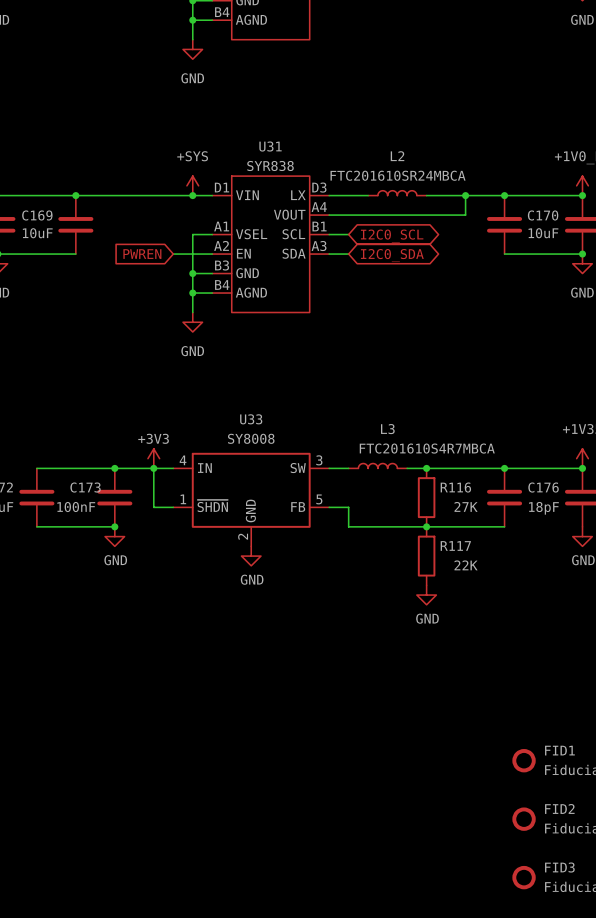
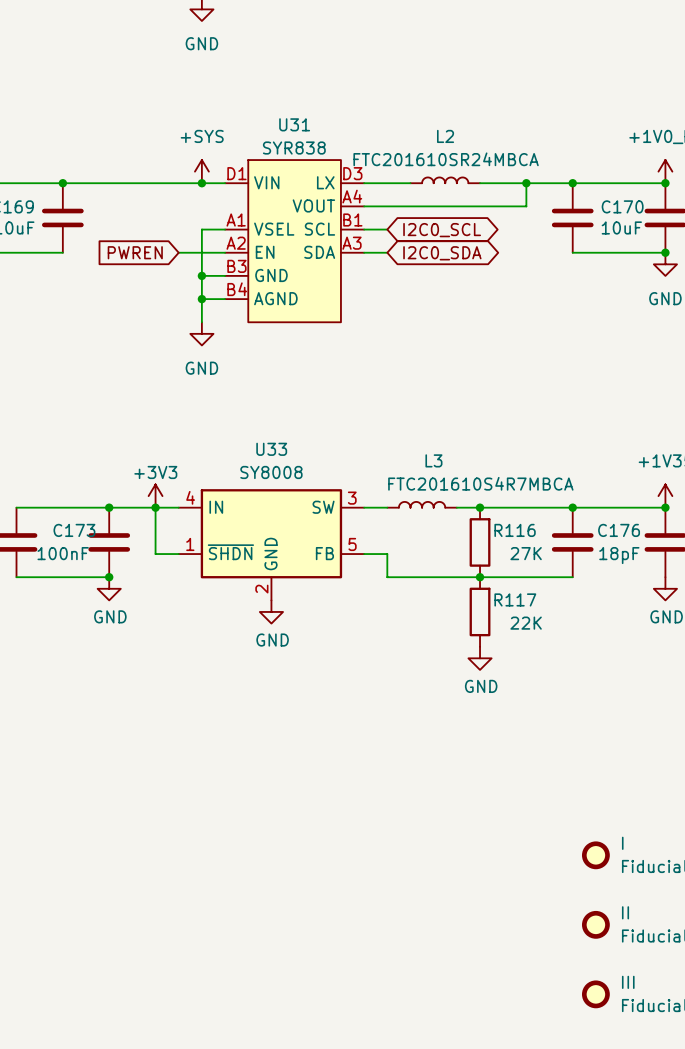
FID1 name: FID1 (559, 750) -> I (622, 843)
FID2 name: FID2 (559, 808) -> II (625, 912)
FID3 name: FID3 (559, 867) -> III (628, 982)

